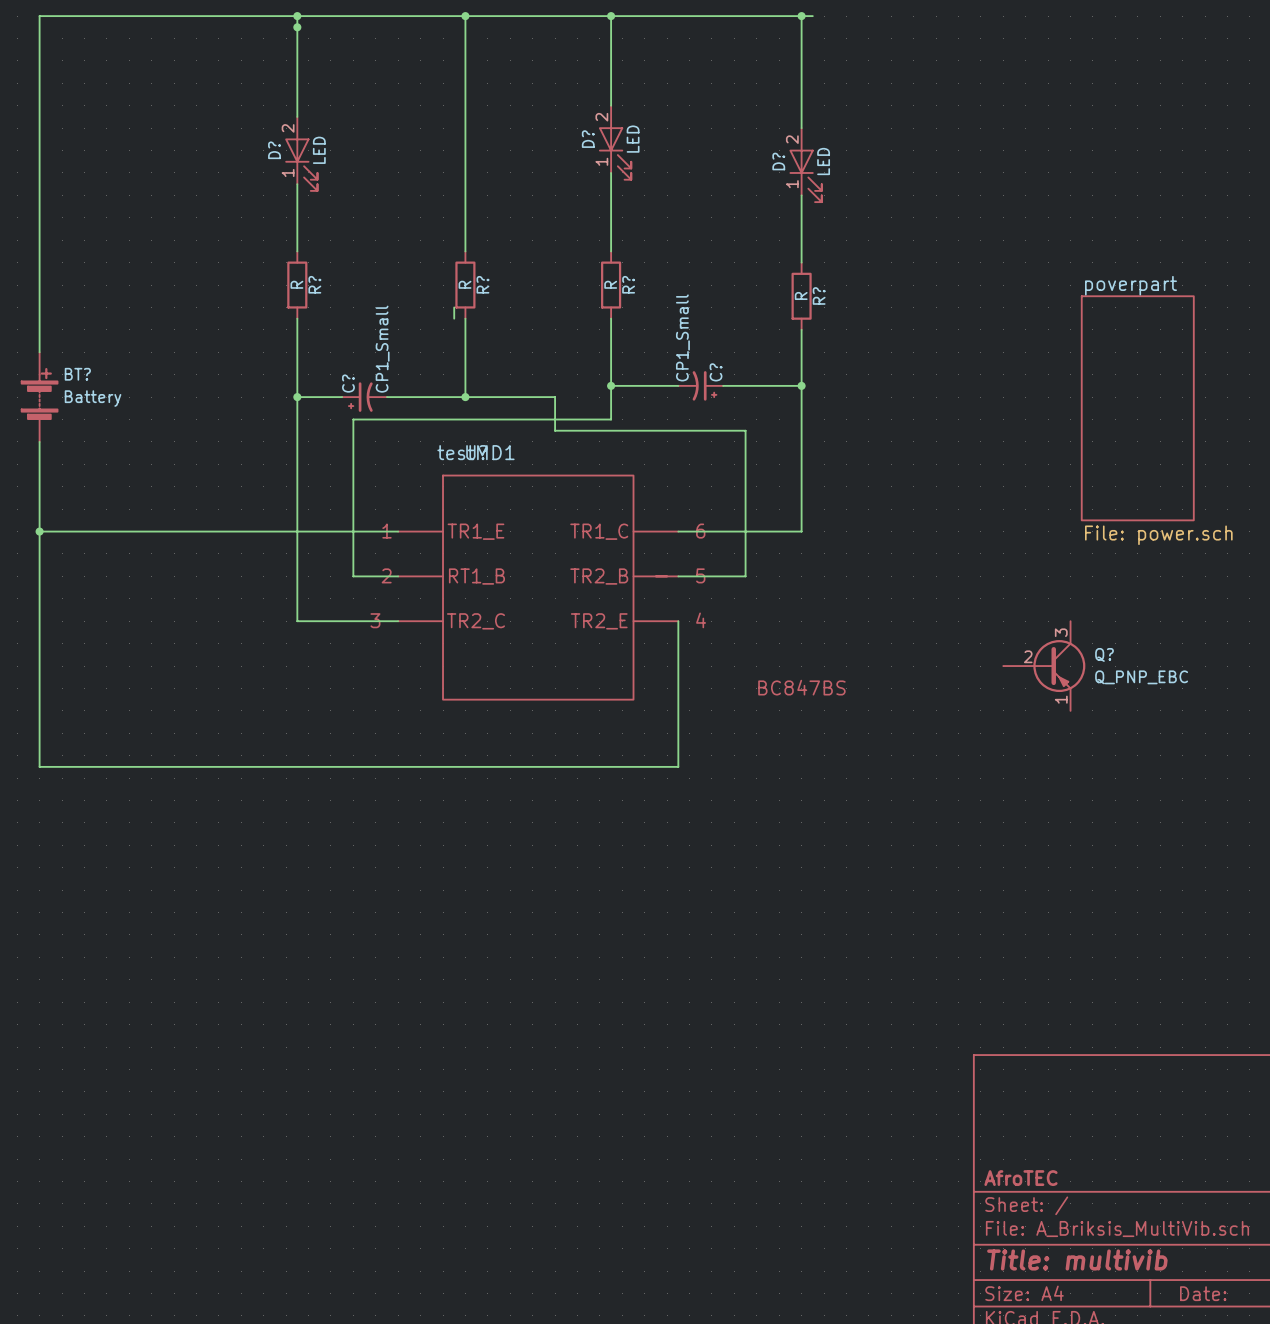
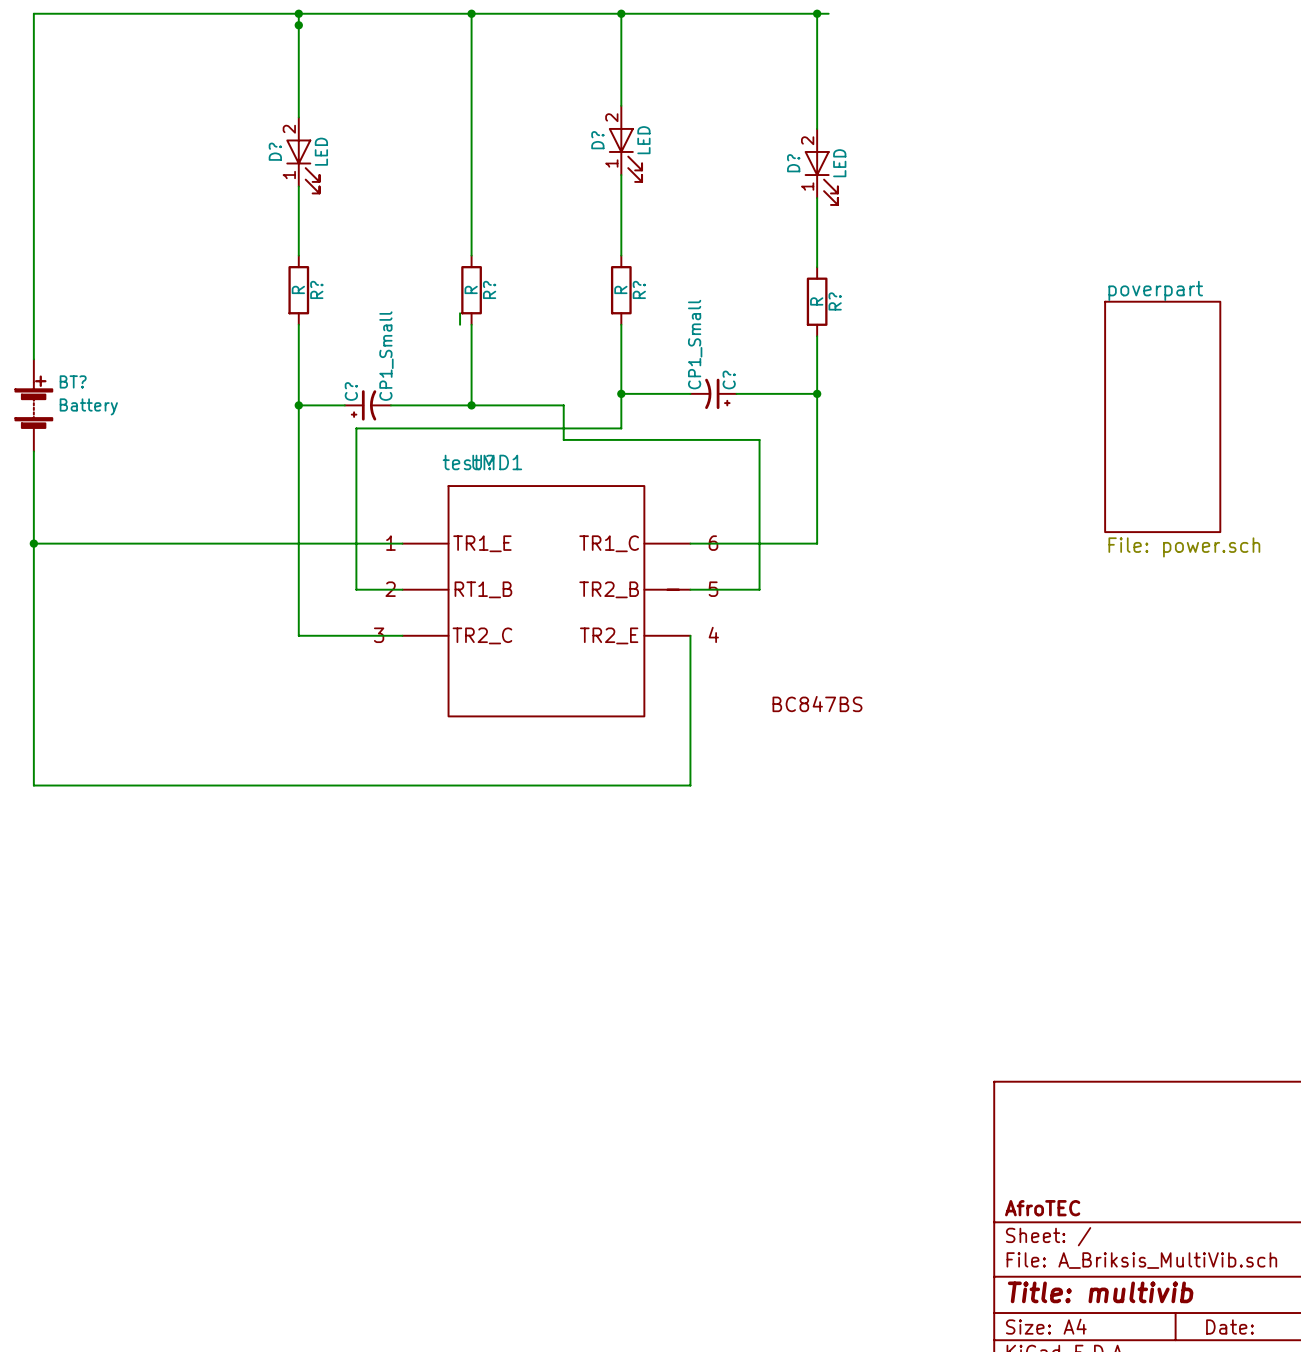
Q?: Q_PNP_EBC (1044, 666) -> none

